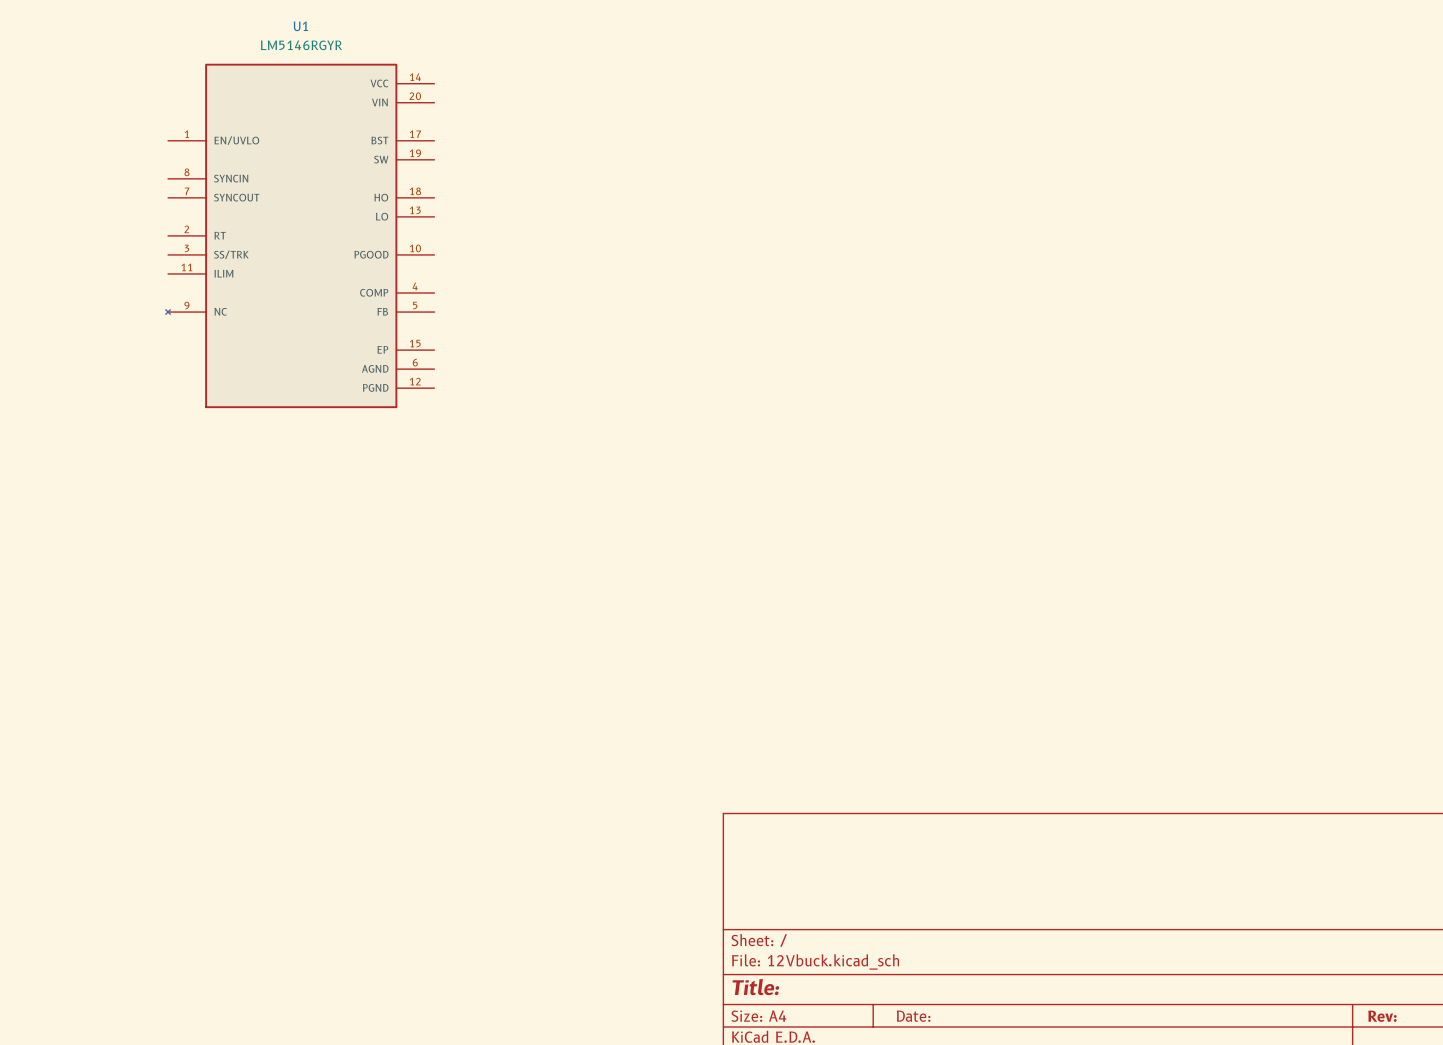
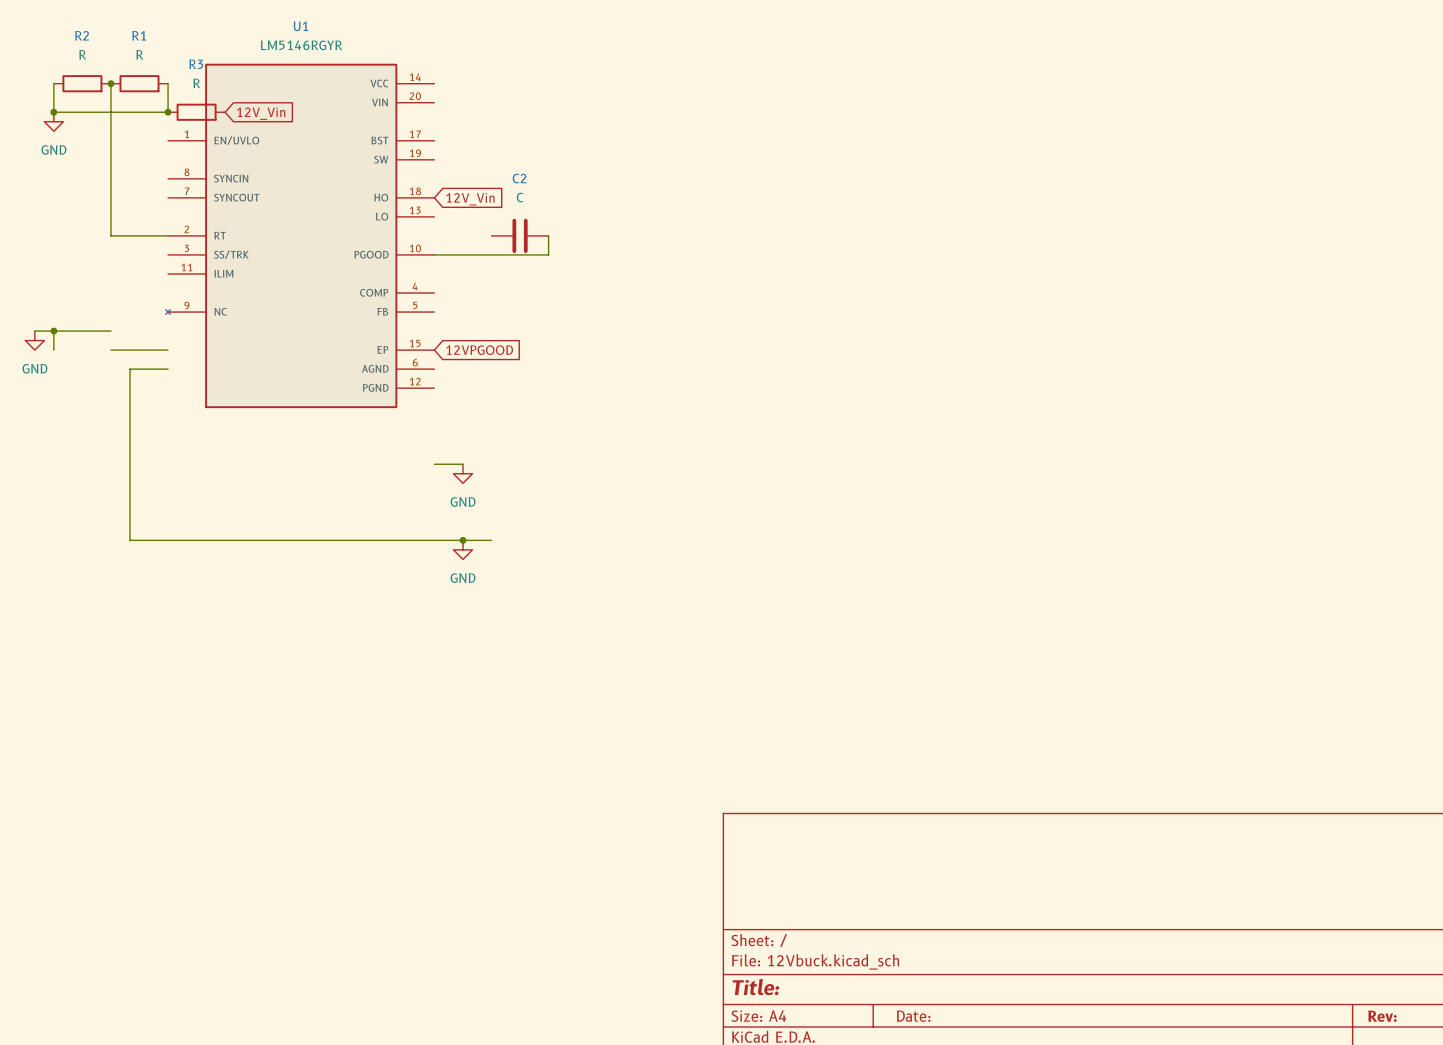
wire: none -> (53, 83) (53, 112) (168, 112) (168, 83)
R2: none -> R (82, 83)
wire: none -> (110, 83) (110, 235) (168, 235)
junction: none -> (110, 83)
R1: none -> R (139, 83)
junction: none -> (53, 112)
junction: none -> (168, 112)
R3: none -> R (196, 112)
global label: none -> 12V_Vin (261, 113)
power symbol: none -> GND (53, 121)
global label: none -> 12V_Vin (470, 199)
C2: none -> C (520, 235)
wire: none -> (548, 235) (548, 254) (434, 254)
wire: none -> (34, 331) (110, 331)
wire: none -> (53, 331) (53, 350)
junction: none -> (53, 331)
power symbol: none -> GND (34, 340)
wire: none -> (110, 350) (168, 350)
global label: none -> 12VPGOOD (479, 350)
wire: none -> (168, 369) (129, 369) (129, 540) (491, 540)
wire: none -> (434, 464) (462, 464)
power symbol: none -> GND (462, 473)
junction: none -> (462, 540)
power symbol: none -> GND (462, 549)

